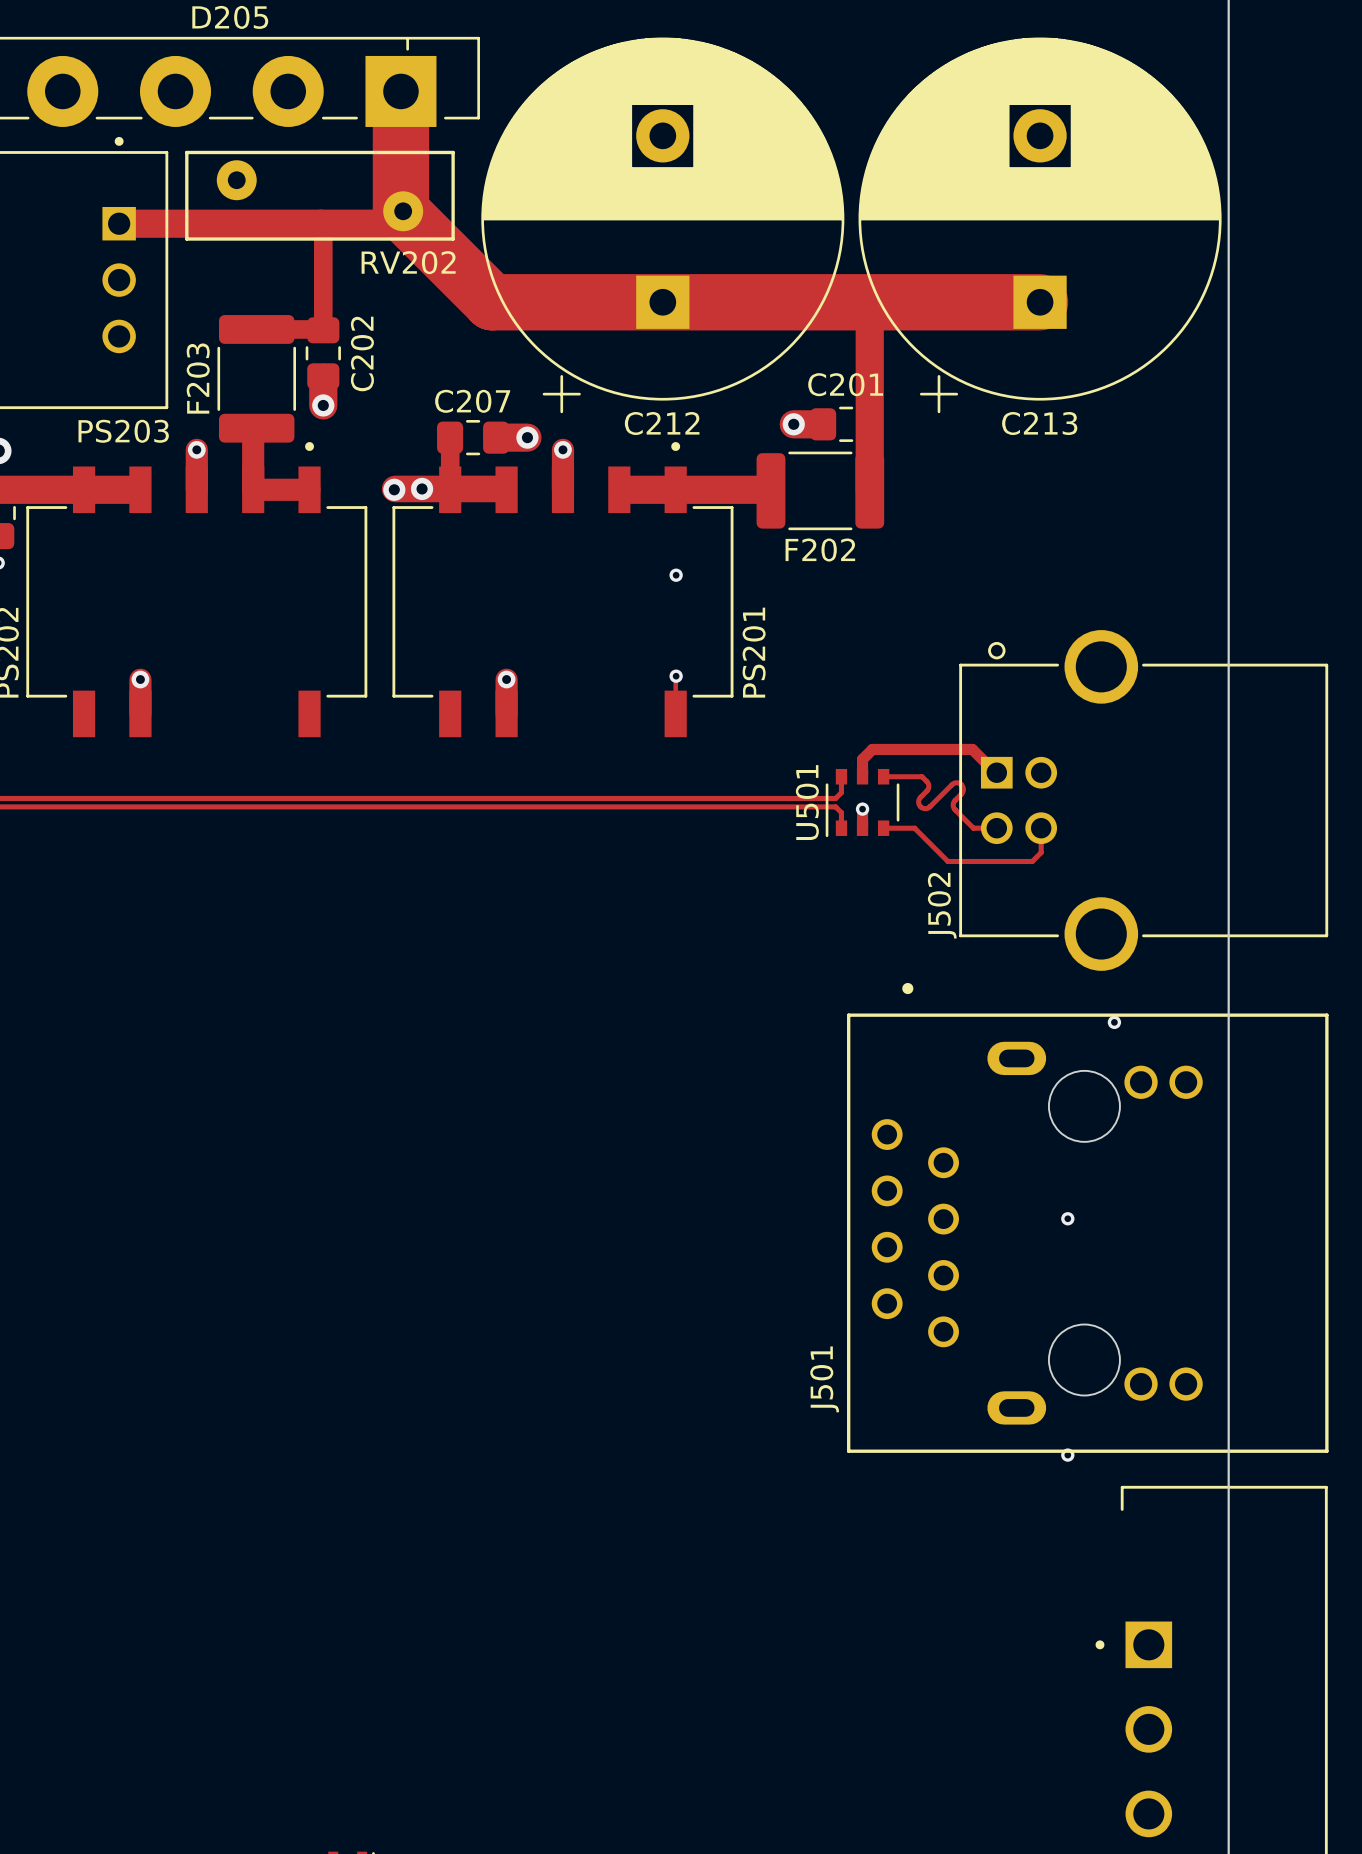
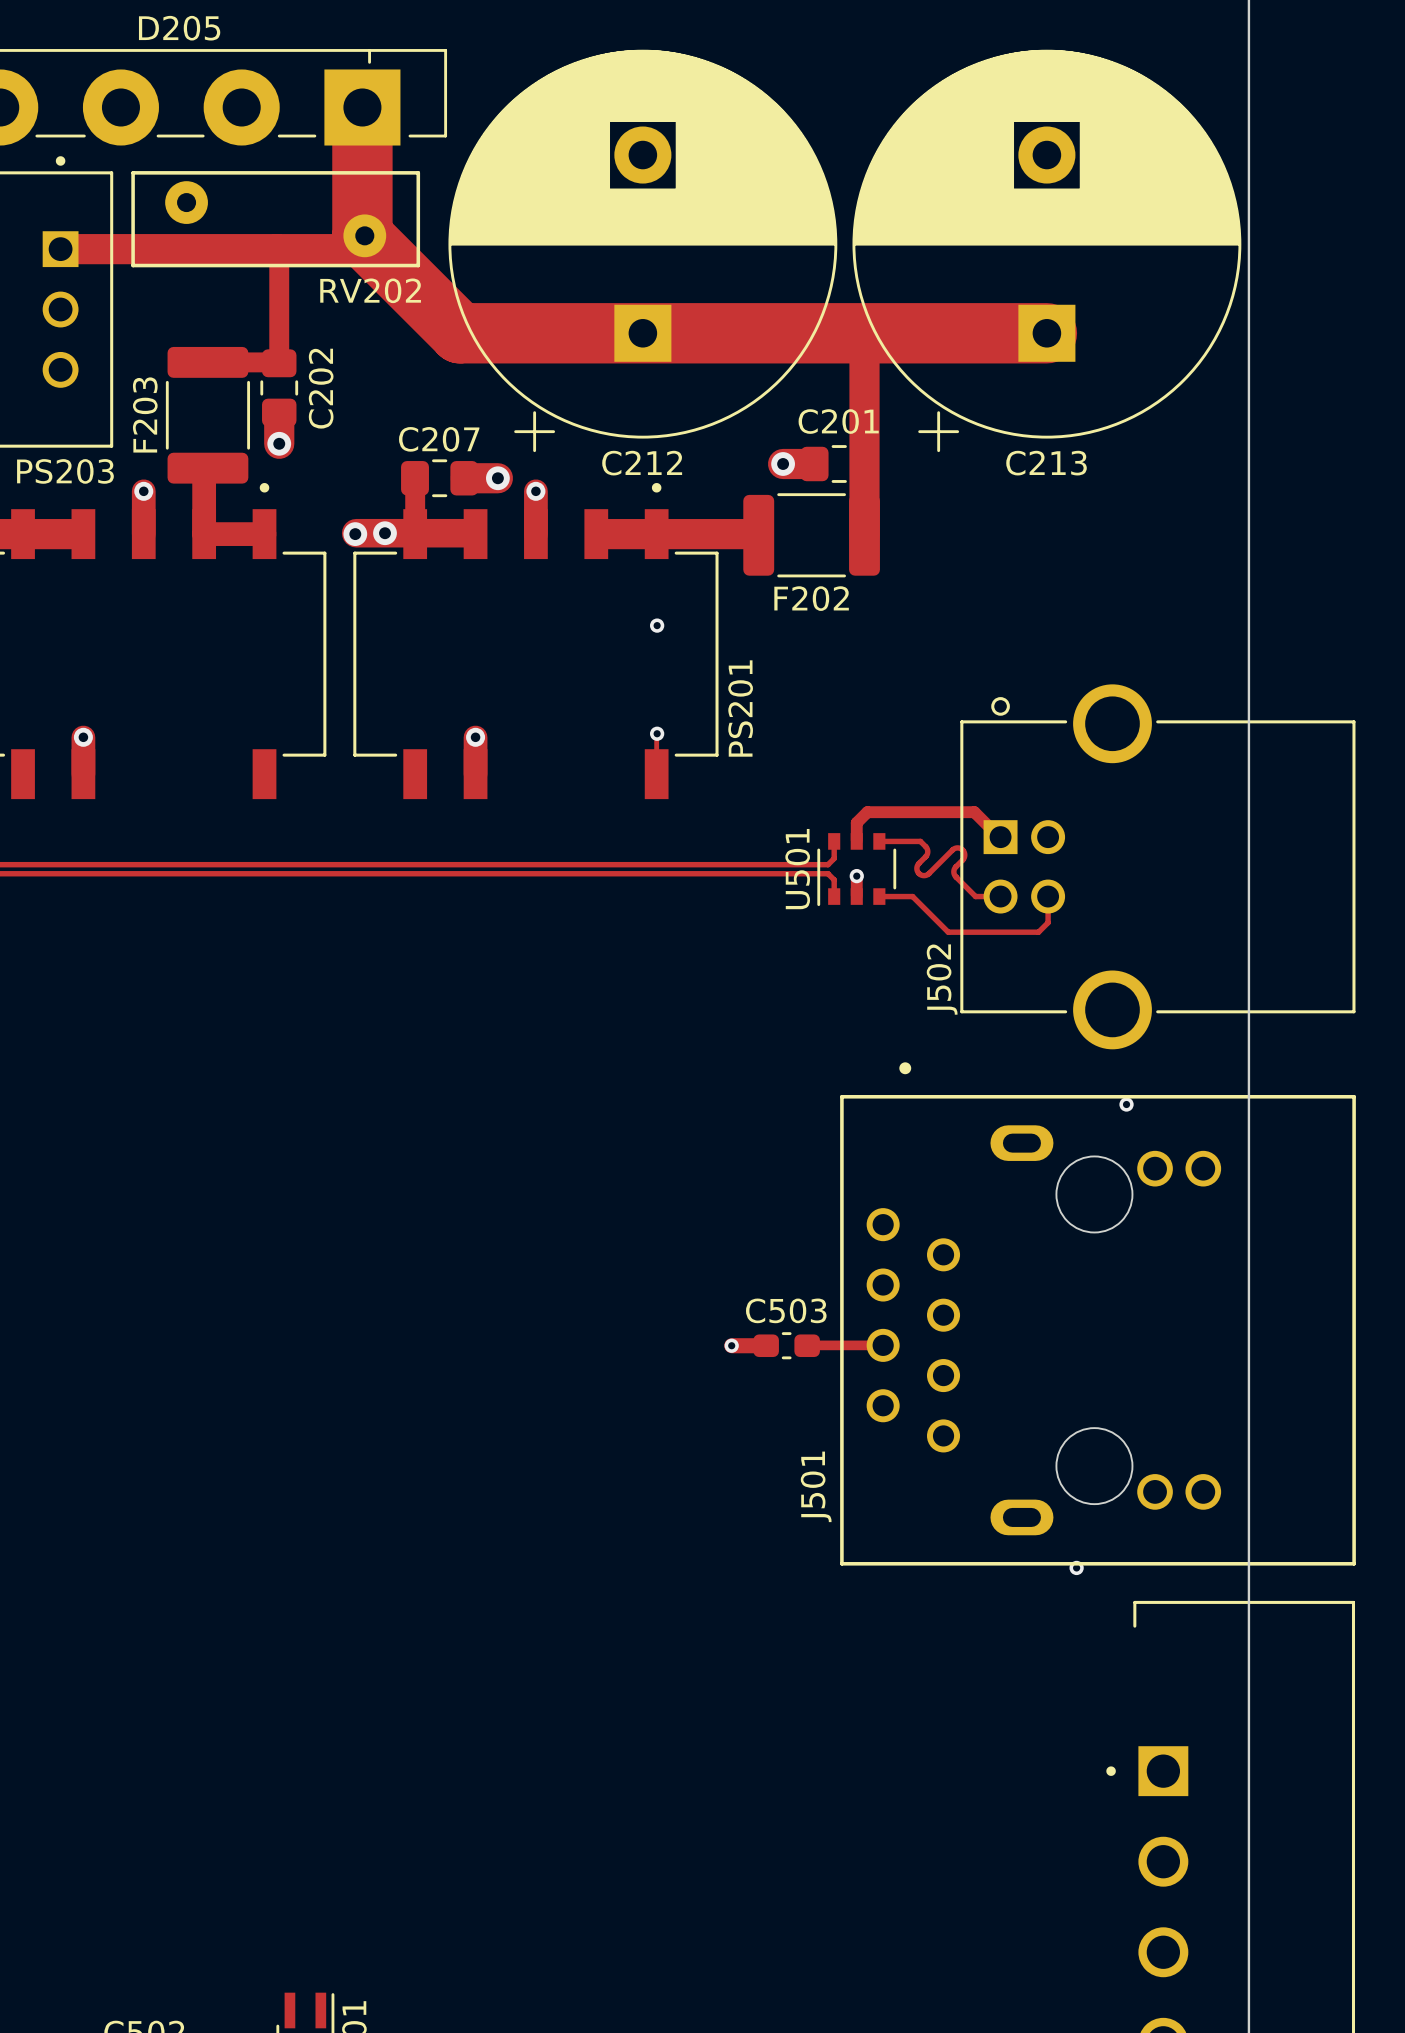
via: (1067, 1218) -> none
track: none -> (731, 1345) (760, 1345)
via: none -> (731, 1345)
C503: none -> (786, 1345)
track: none -> (883, 1345) (811, 1345)

